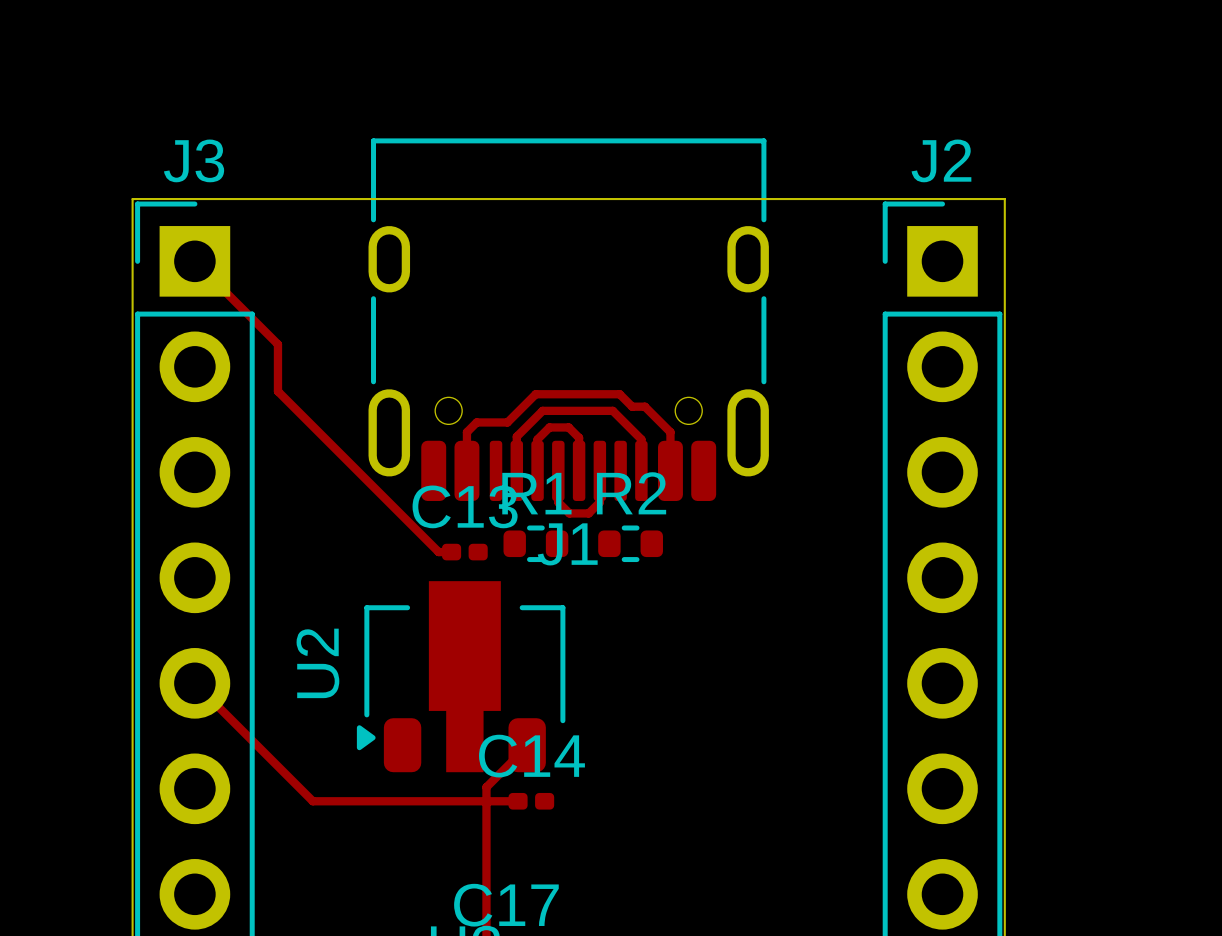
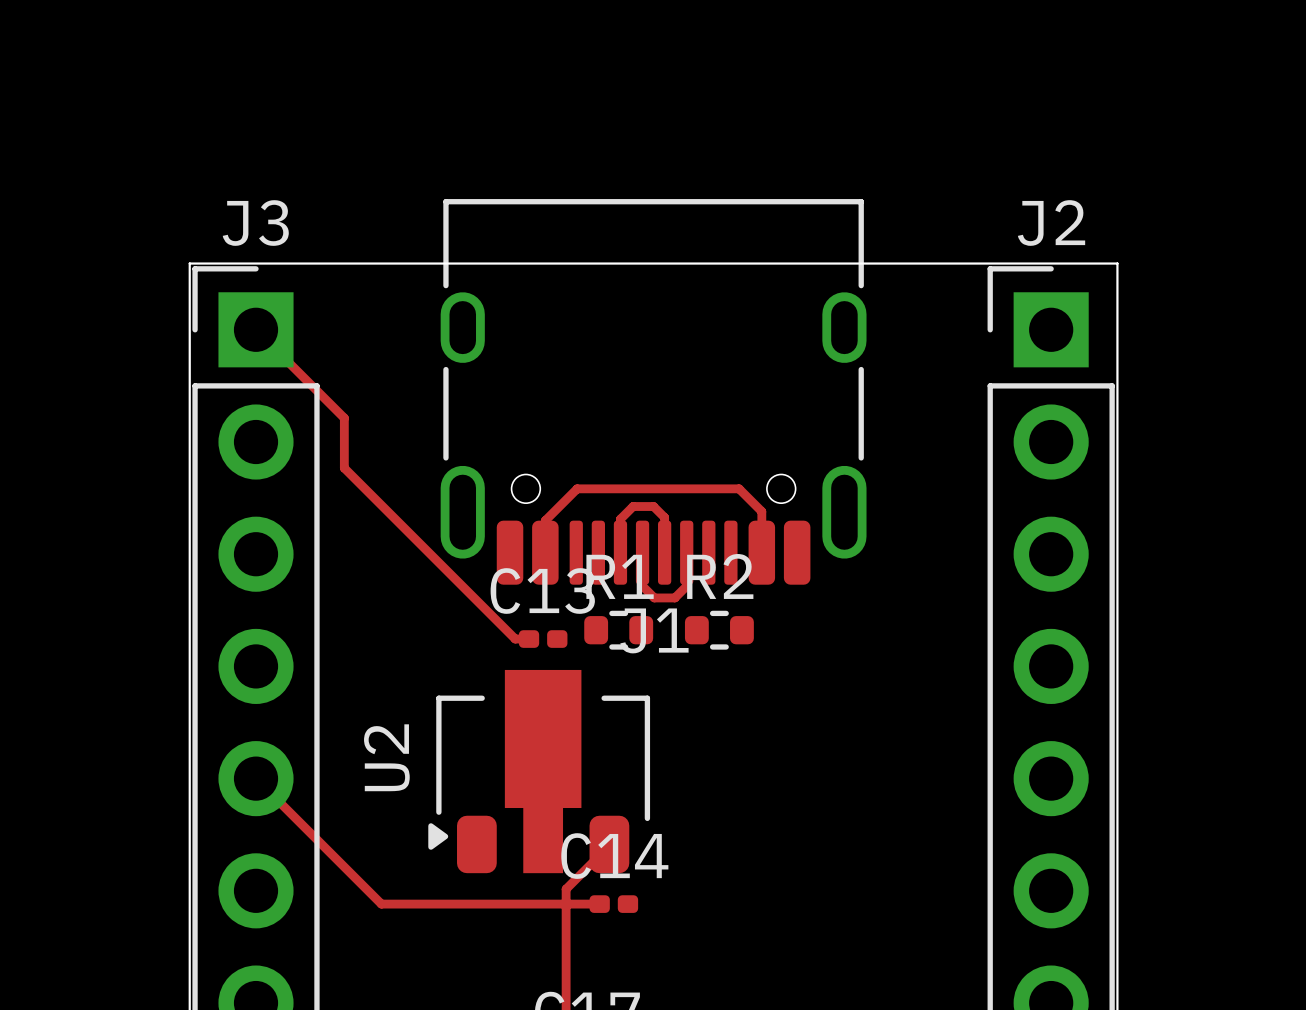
top track: (542, 410) (516, 436) (516, 470) -> (625, 488) (577, 488) (545, 520)
top track: (612, 410) (641, 439) (641, 470) -> (700, 488) (739, 488)
top track: (649, 410) (644, 406) (632, 406) (619, 394) (535, 394) (507, 422) (476, 422) (466, 432) (466, 440) -> none

